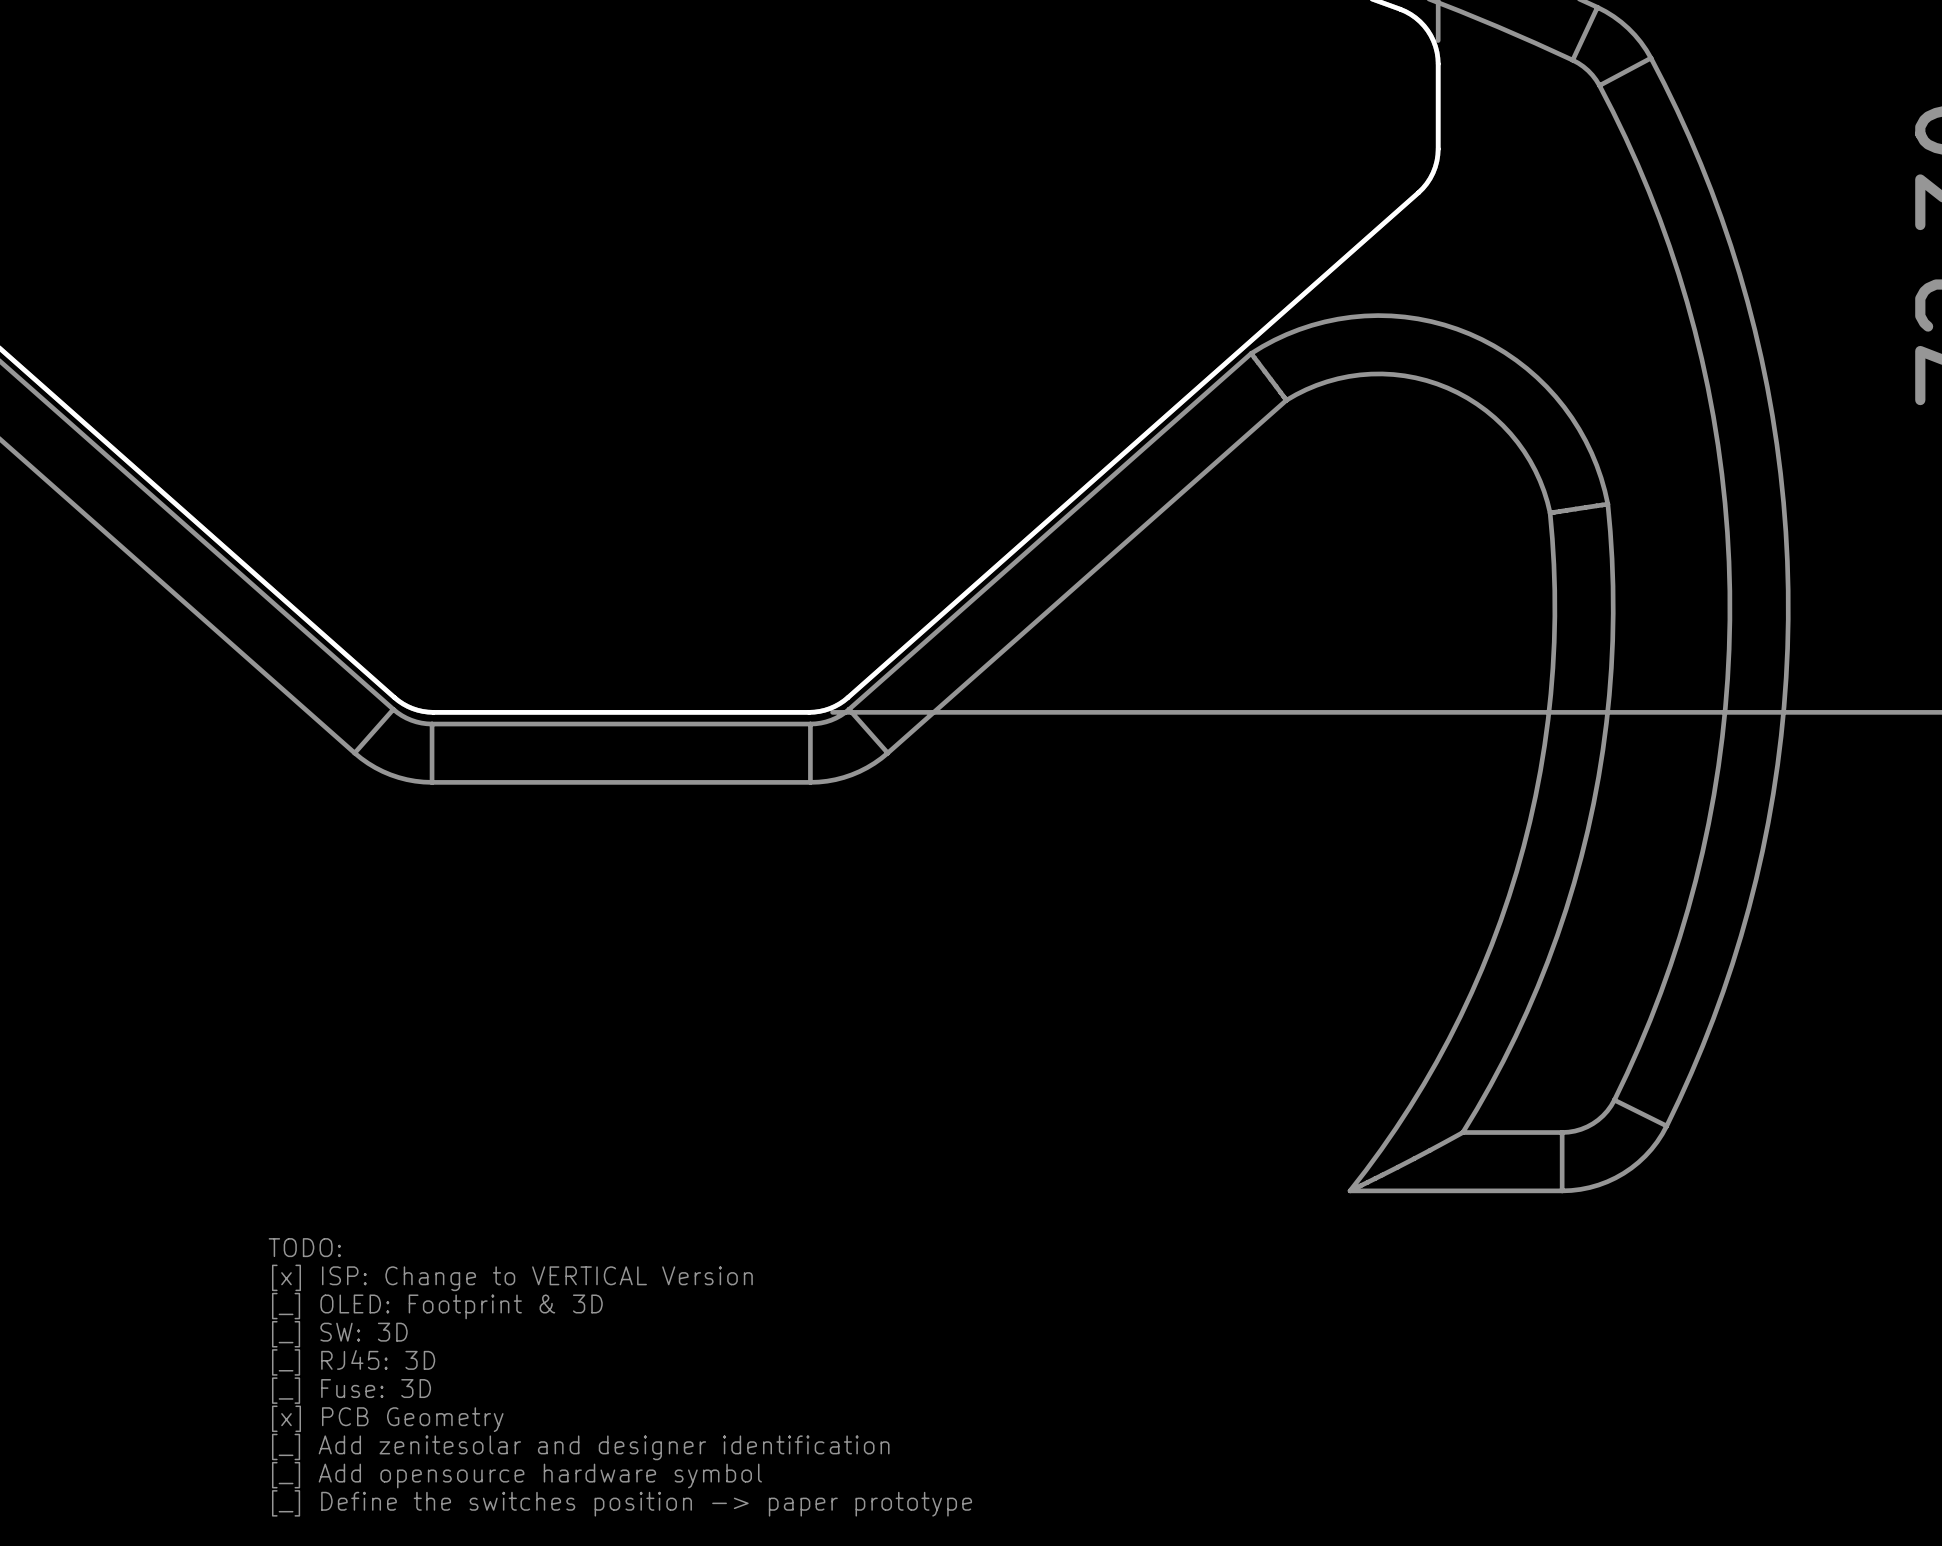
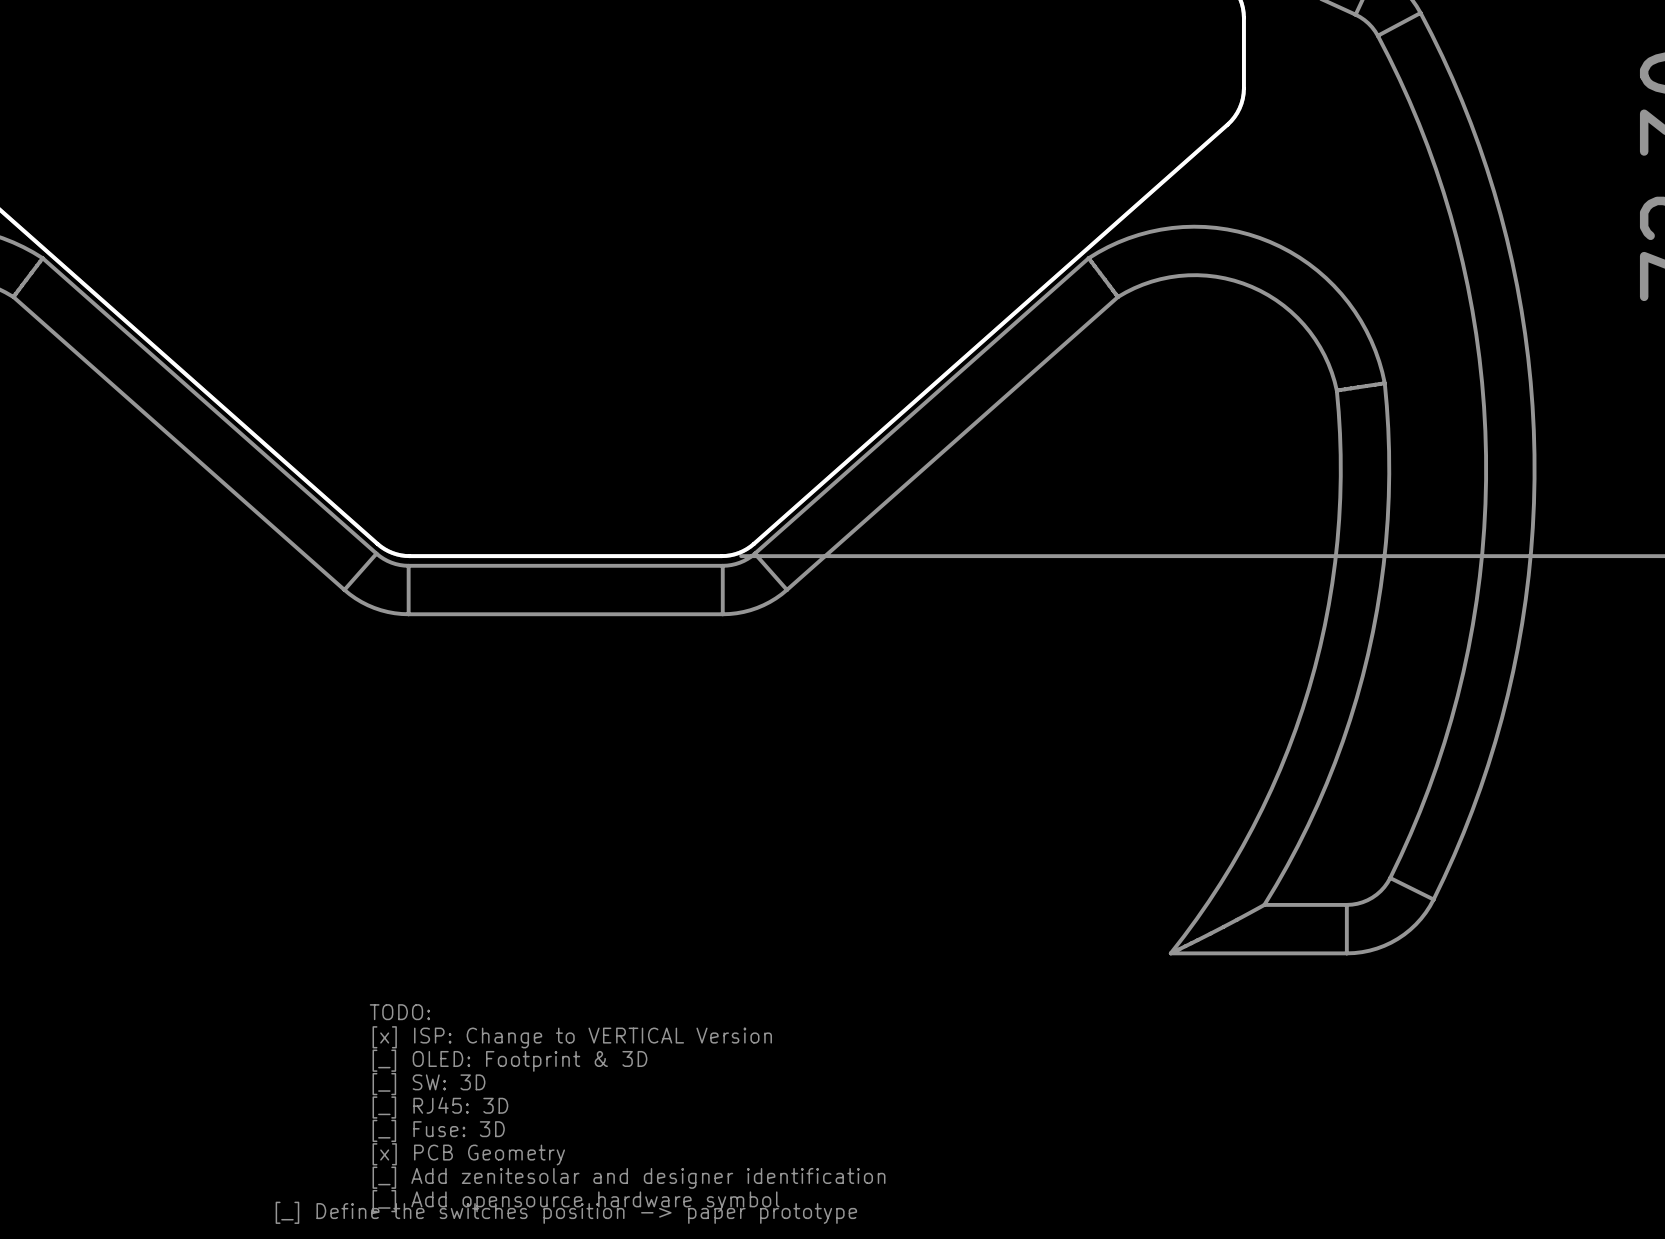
text position: TODO: (304, 1247) -> TODO: (399, 1012)
text position: [x] ISP: Change to VERTICAL Version (512, 1277) -> [x] ISP: Change to VERTICAL Version (572, 1037)
text position: [_] OLED: Footprint & 3D (437, 1306) -> [_] OLED: Footprint & 3D (509, 1060)
text position: [_] SW: 3D (339, 1334) -> [_] SW: 3D (428, 1084)
text position: [_] RJ45: 3D (353, 1362) -> [_] RJ45: 3D (440, 1107)
text position: [_] Fuse: 3D (351, 1390) -> [_] Fuse: 3D (438, 1130)
text position: [x] PCB Geometry (387, 1418) -> [x] PCB Geometry (468, 1154)
text position: [_] Add zenitesolar and designer identification (580, 1446) -> [_] Add zenitesolar and designer identification (628, 1177)
text position: [_] Add opensource hardware symbol (516, 1475) -> [_] Add opensource hardware symbol (576, 1201)

